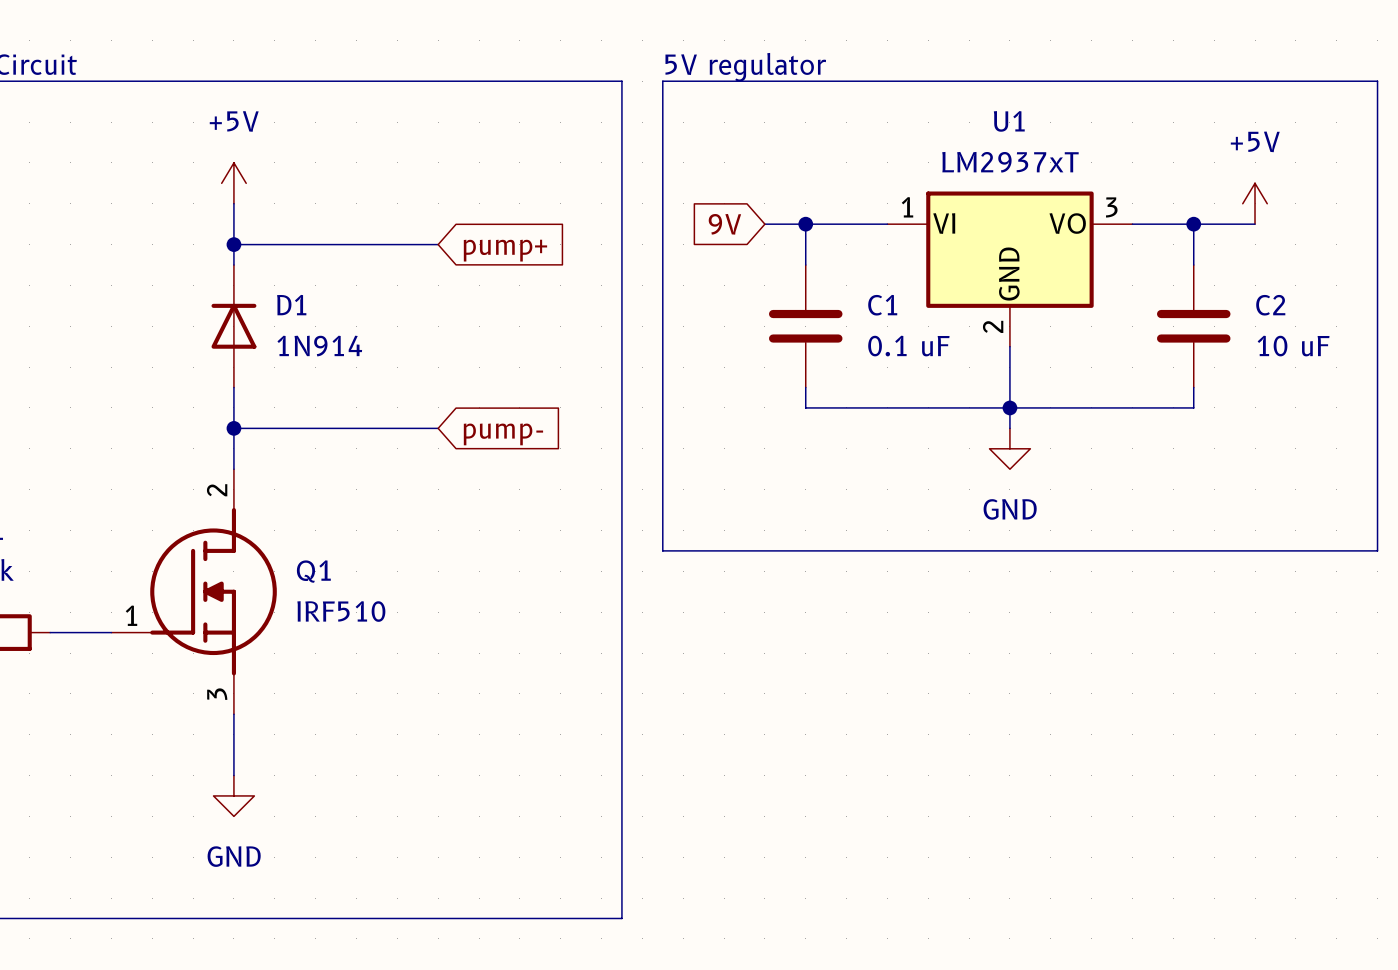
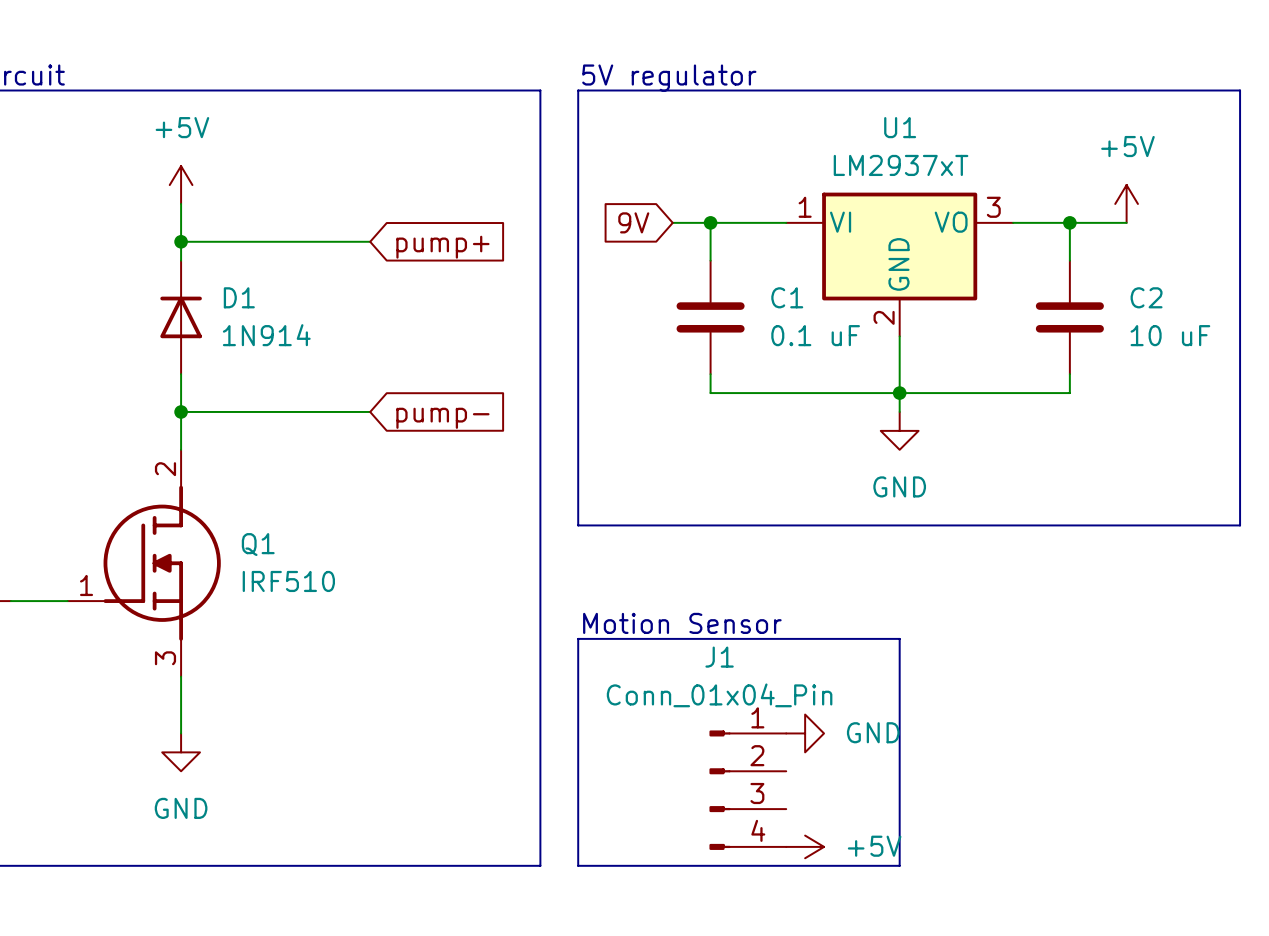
text: none -> Motion Sensor (682, 623)
line: none -> (578, 638) (899, 638) (899, 865) (578, 865) (578, 638)
power symbol: none -> GND (805, 733)
J1: none -> Conn_01x04_Pin (747, 790)
power symbol: none -> +5V (805, 846)

